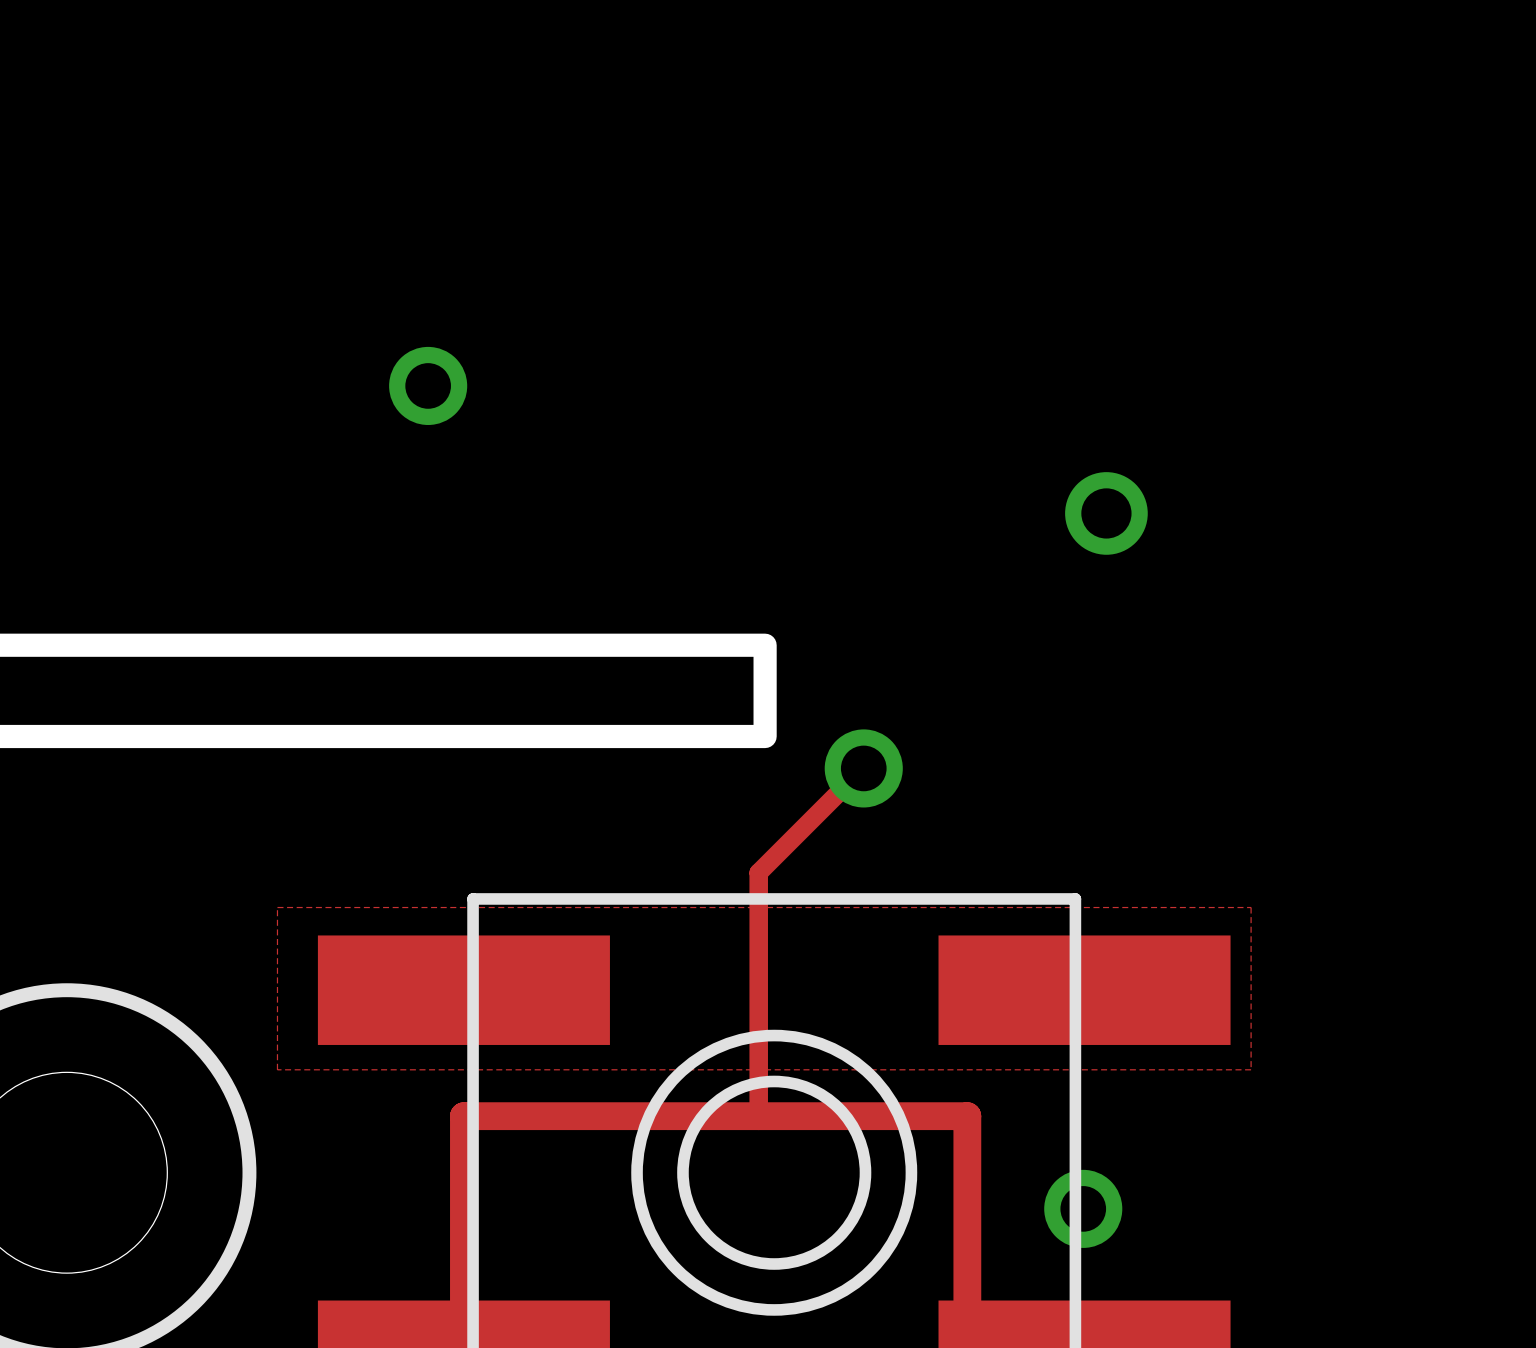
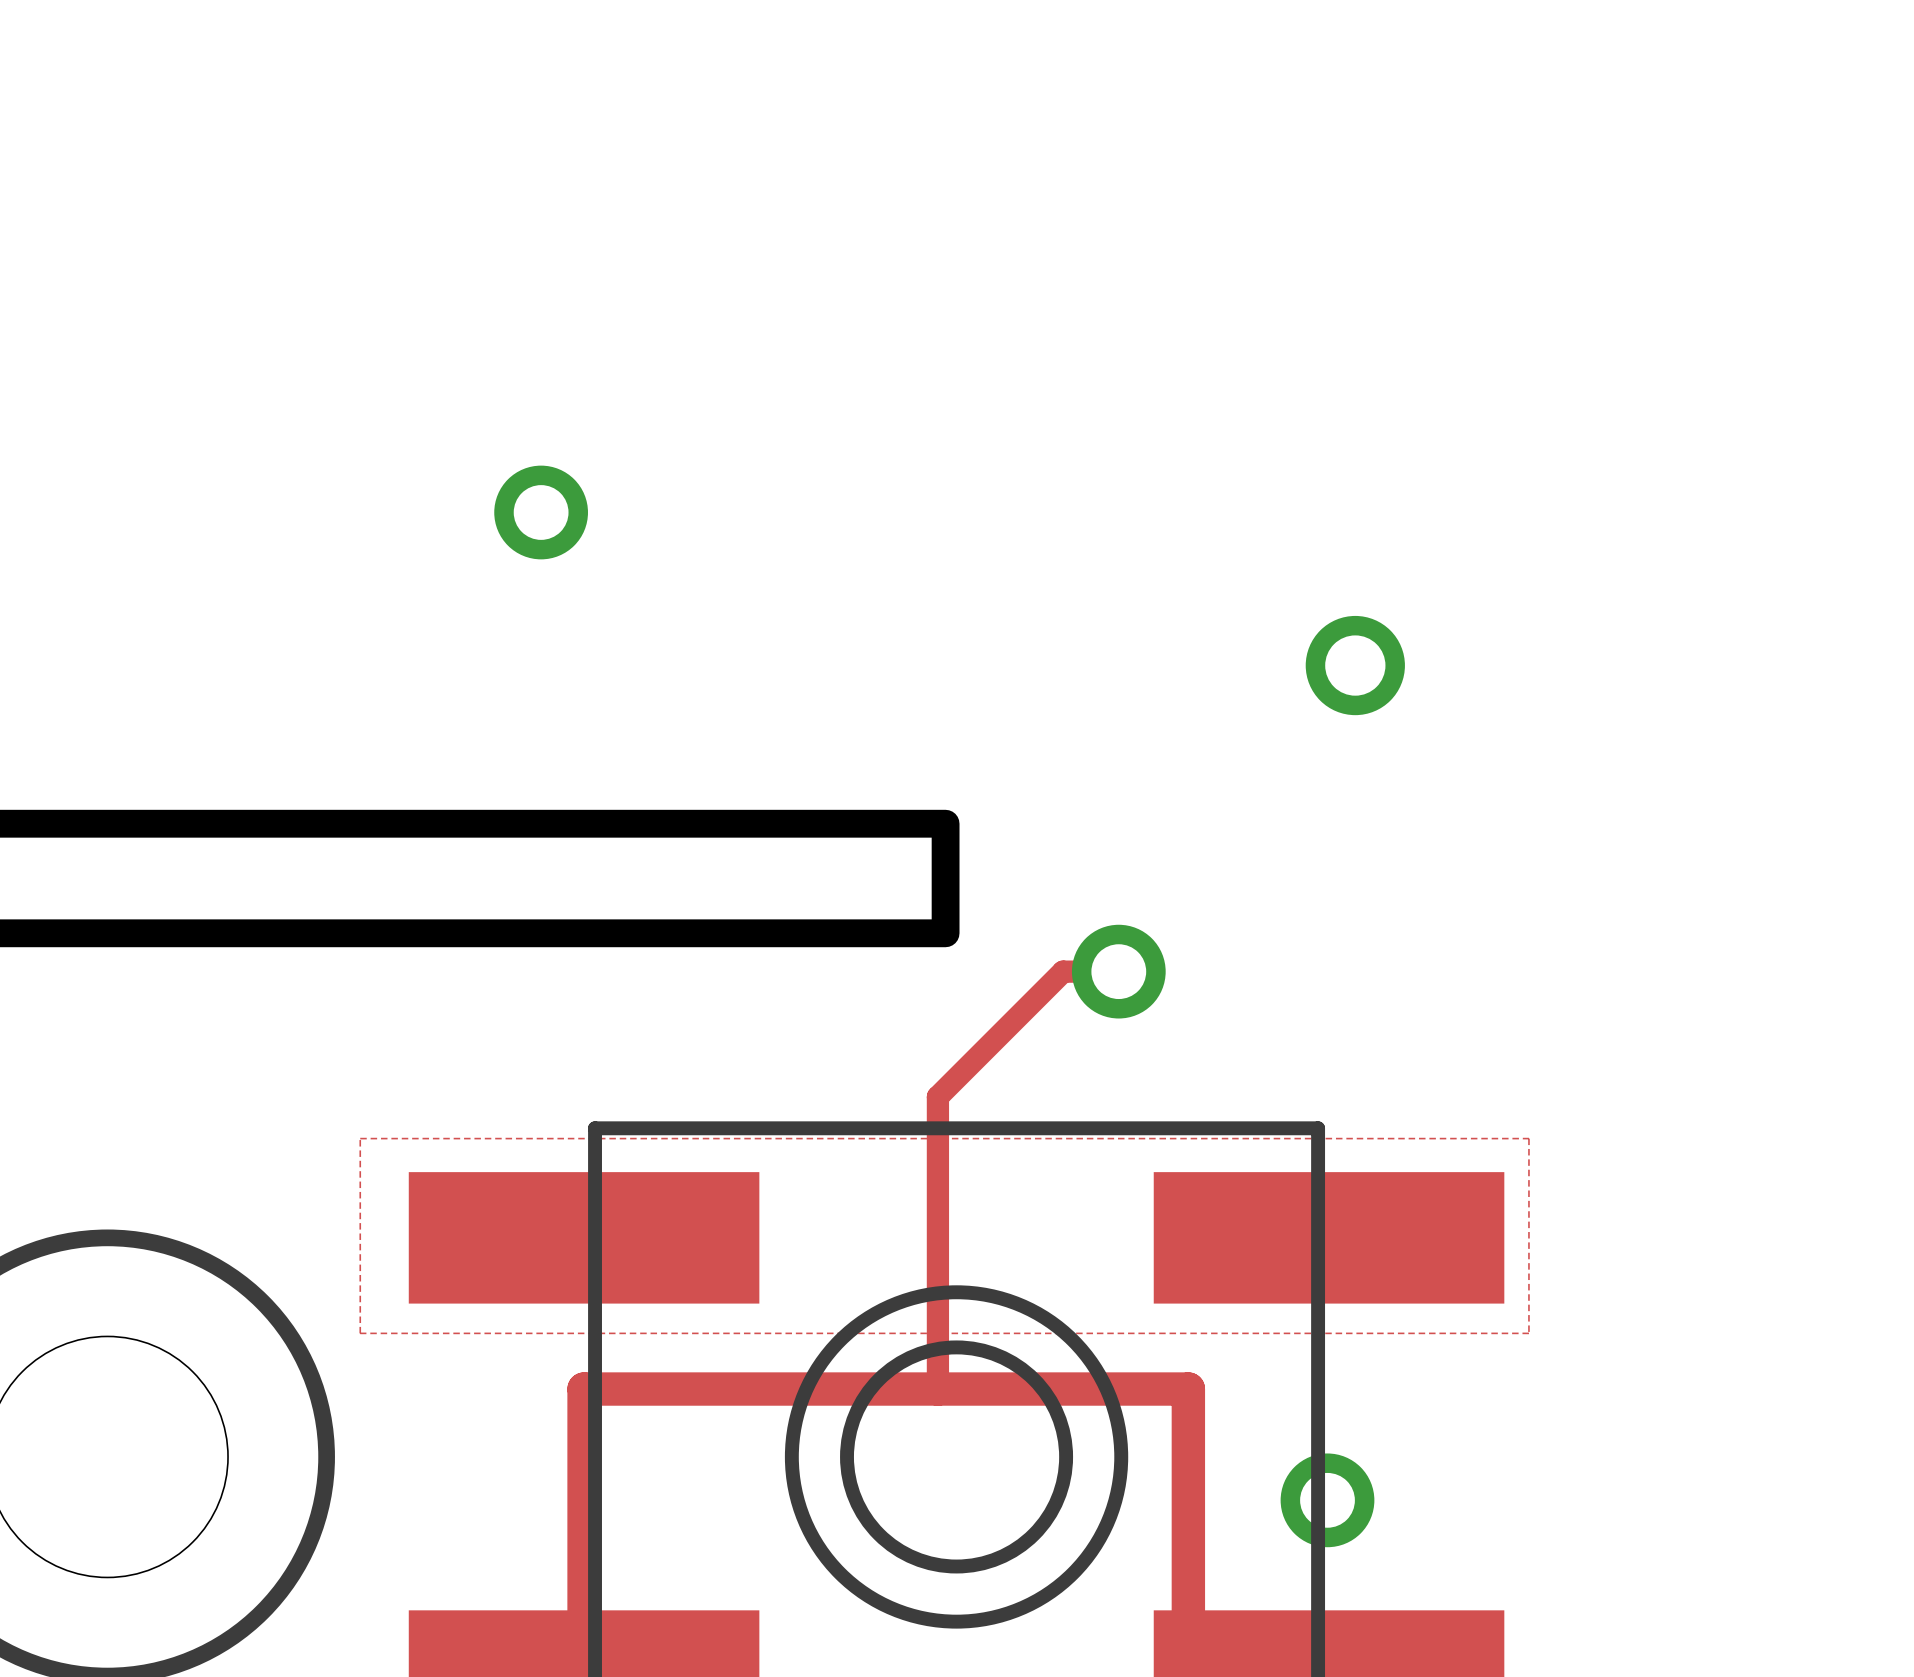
via position: (863, 768) -> (1118, 971)

